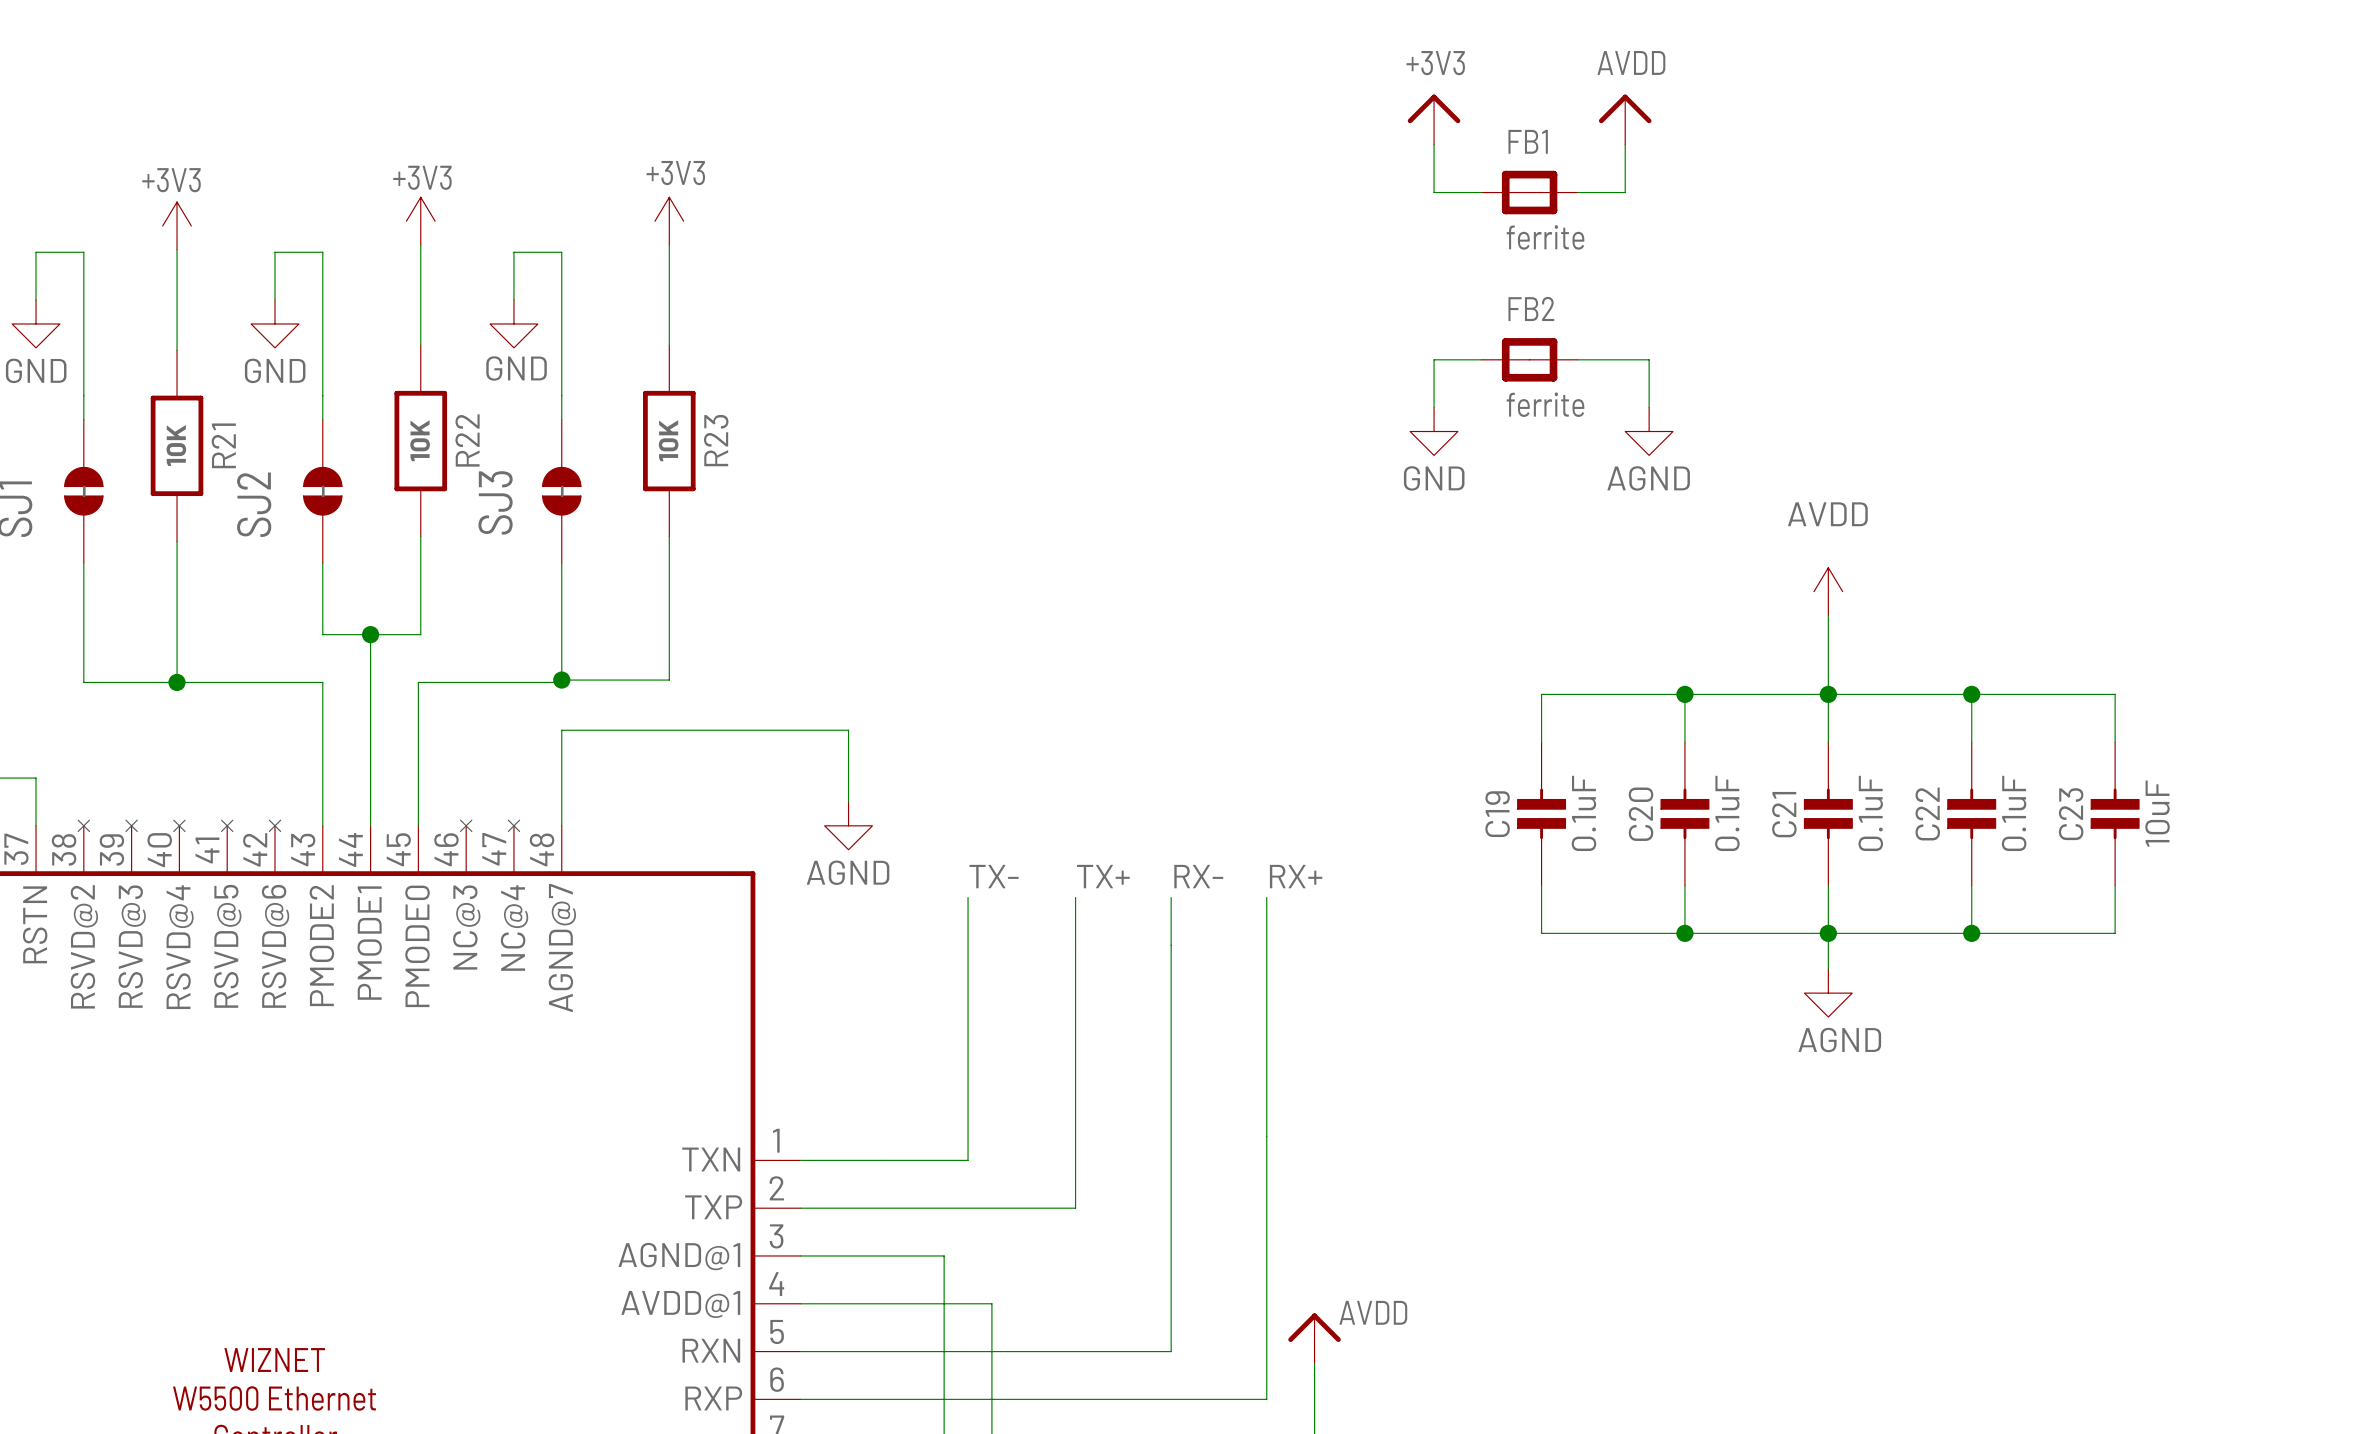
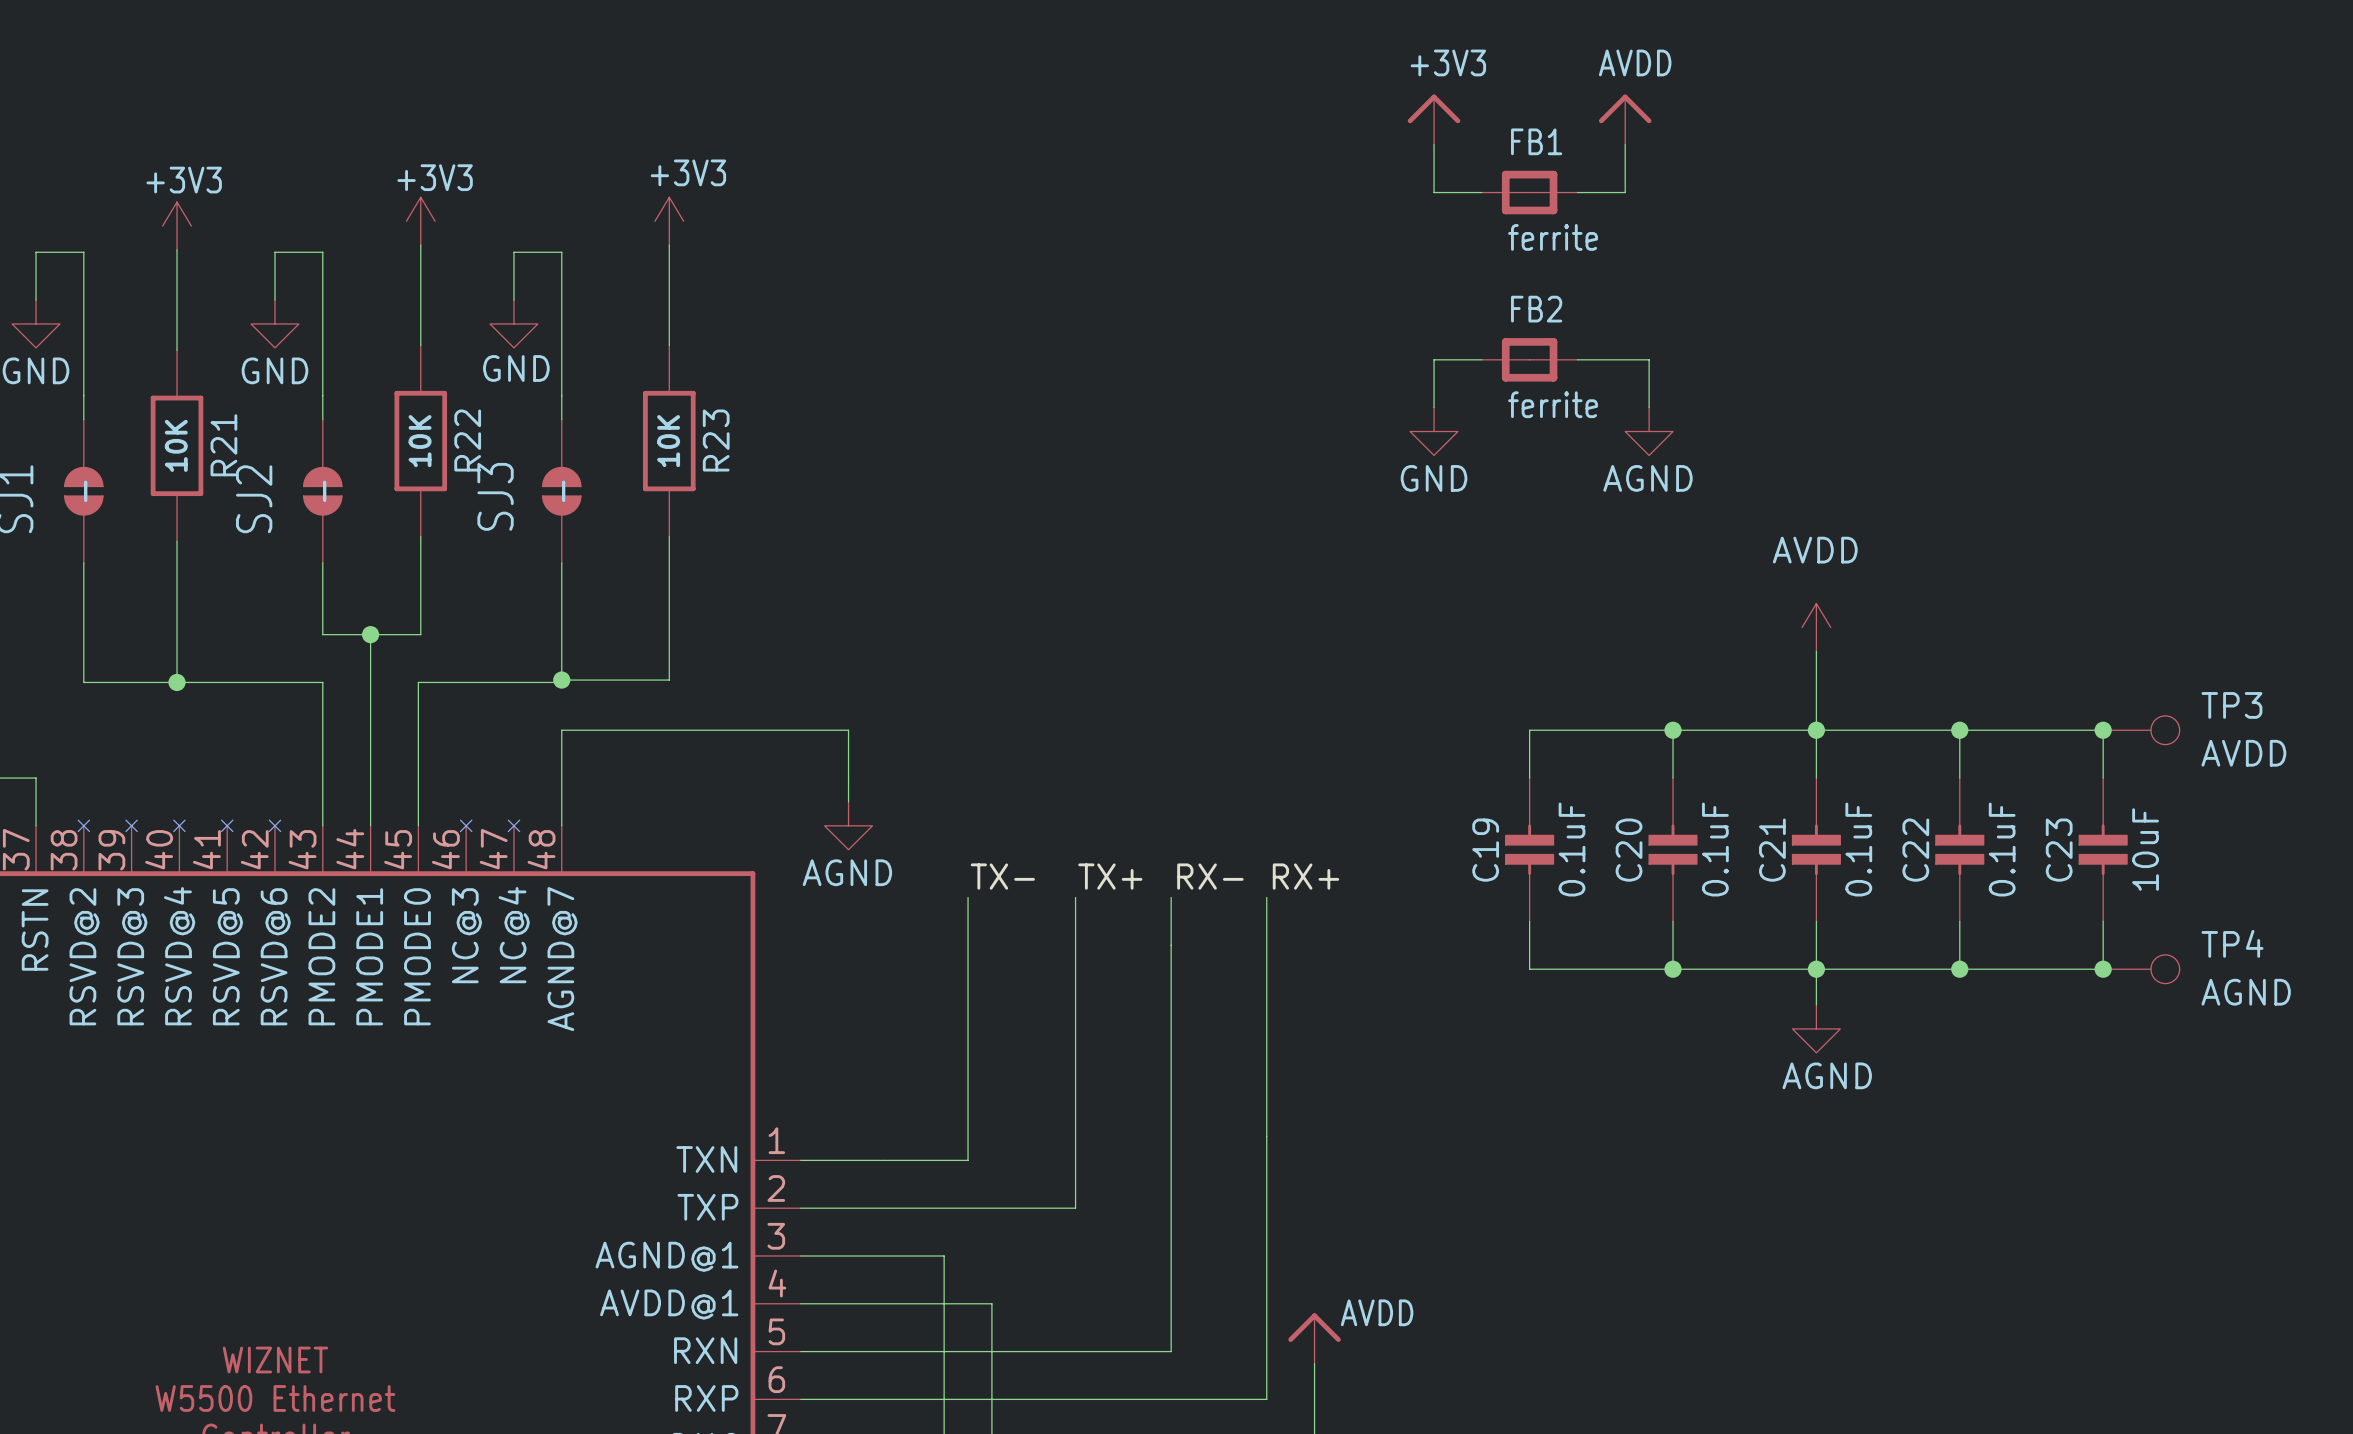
power symbol position: AVDD (1828, 591) -> AVDD (1816, 627)
wire: (1828, 615) (1828, 742) -> (1816, 651) (1816, 778)
wire: (1684, 694) (1684, 742) -> (1673, 730) (1673, 778)
junction position: (1684, 694) -> (1673, 730)
junction position: (1828, 694) -> (1816, 730)
wire: (1971, 694) (1971, 742) -> (1959, 730) (1959, 778)
junction position: (1971, 694) -> (1959, 730)
junction: none -> (2103, 730)
TP3: none -> AVDD (2141, 730)
wire: (1541, 742) (1541, 694) (2115, 694) (2115, 742) -> (1529, 778) (1529, 730) (2103, 730) (2103, 778)
C19 position: (1541, 813) -> (1529, 849)
C20 position: (1684, 813) -> (1673, 849)
C21 position: (1828, 813) -> (1816, 849)
C22 position: (1971, 813) -> (1959, 849)
C23 position: (2115, 813) -> (2103, 849)
wire: (1541, 885) (1541, 933) (2115, 933) (2115, 885) -> (1529, 921) (1529, 969) (2103, 969) (2103, 921)
wire: (1684, 885) (1684, 933) -> (1673, 921) (1673, 969)
wire: (1828, 885) (1828, 969) -> (1816, 921) (1816, 1005)
wire: (1971, 885) (1971, 933) -> (1959, 921) (1959, 969)
junction position: (1684, 933) -> (1673, 969)
junction position: (1828, 933) -> (1816, 969)
junction position: (1971, 933) -> (1959, 969)
junction: none -> (2103, 969)
TP4: none -> AGND (2141, 969)
power symbol position: AGND (1828, 993) -> AGND (1816, 1028)

